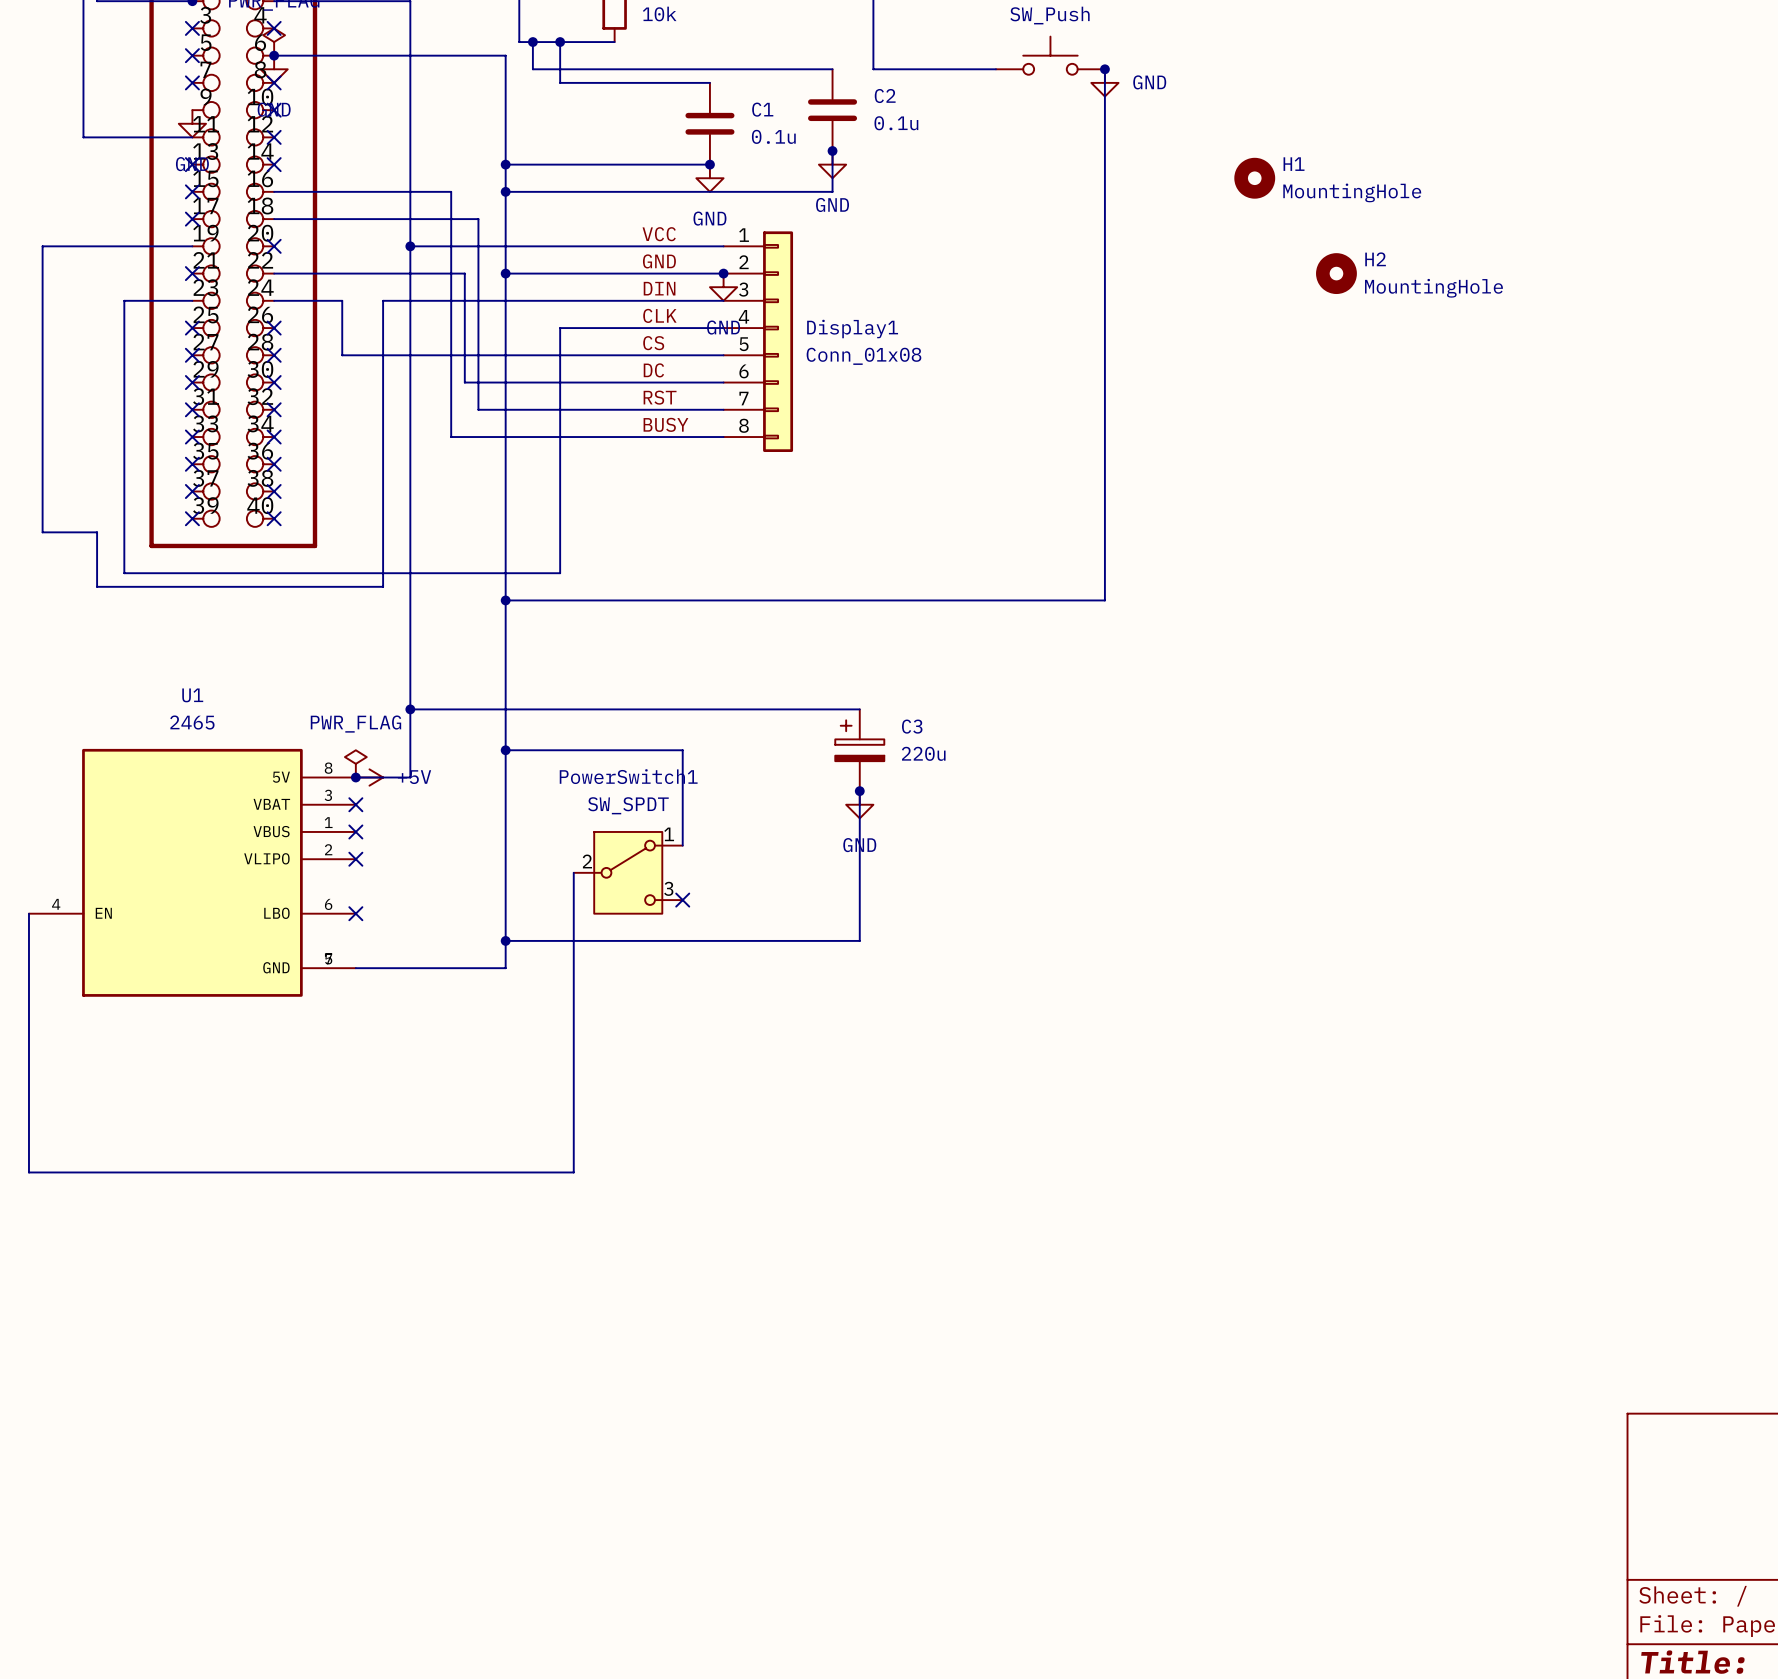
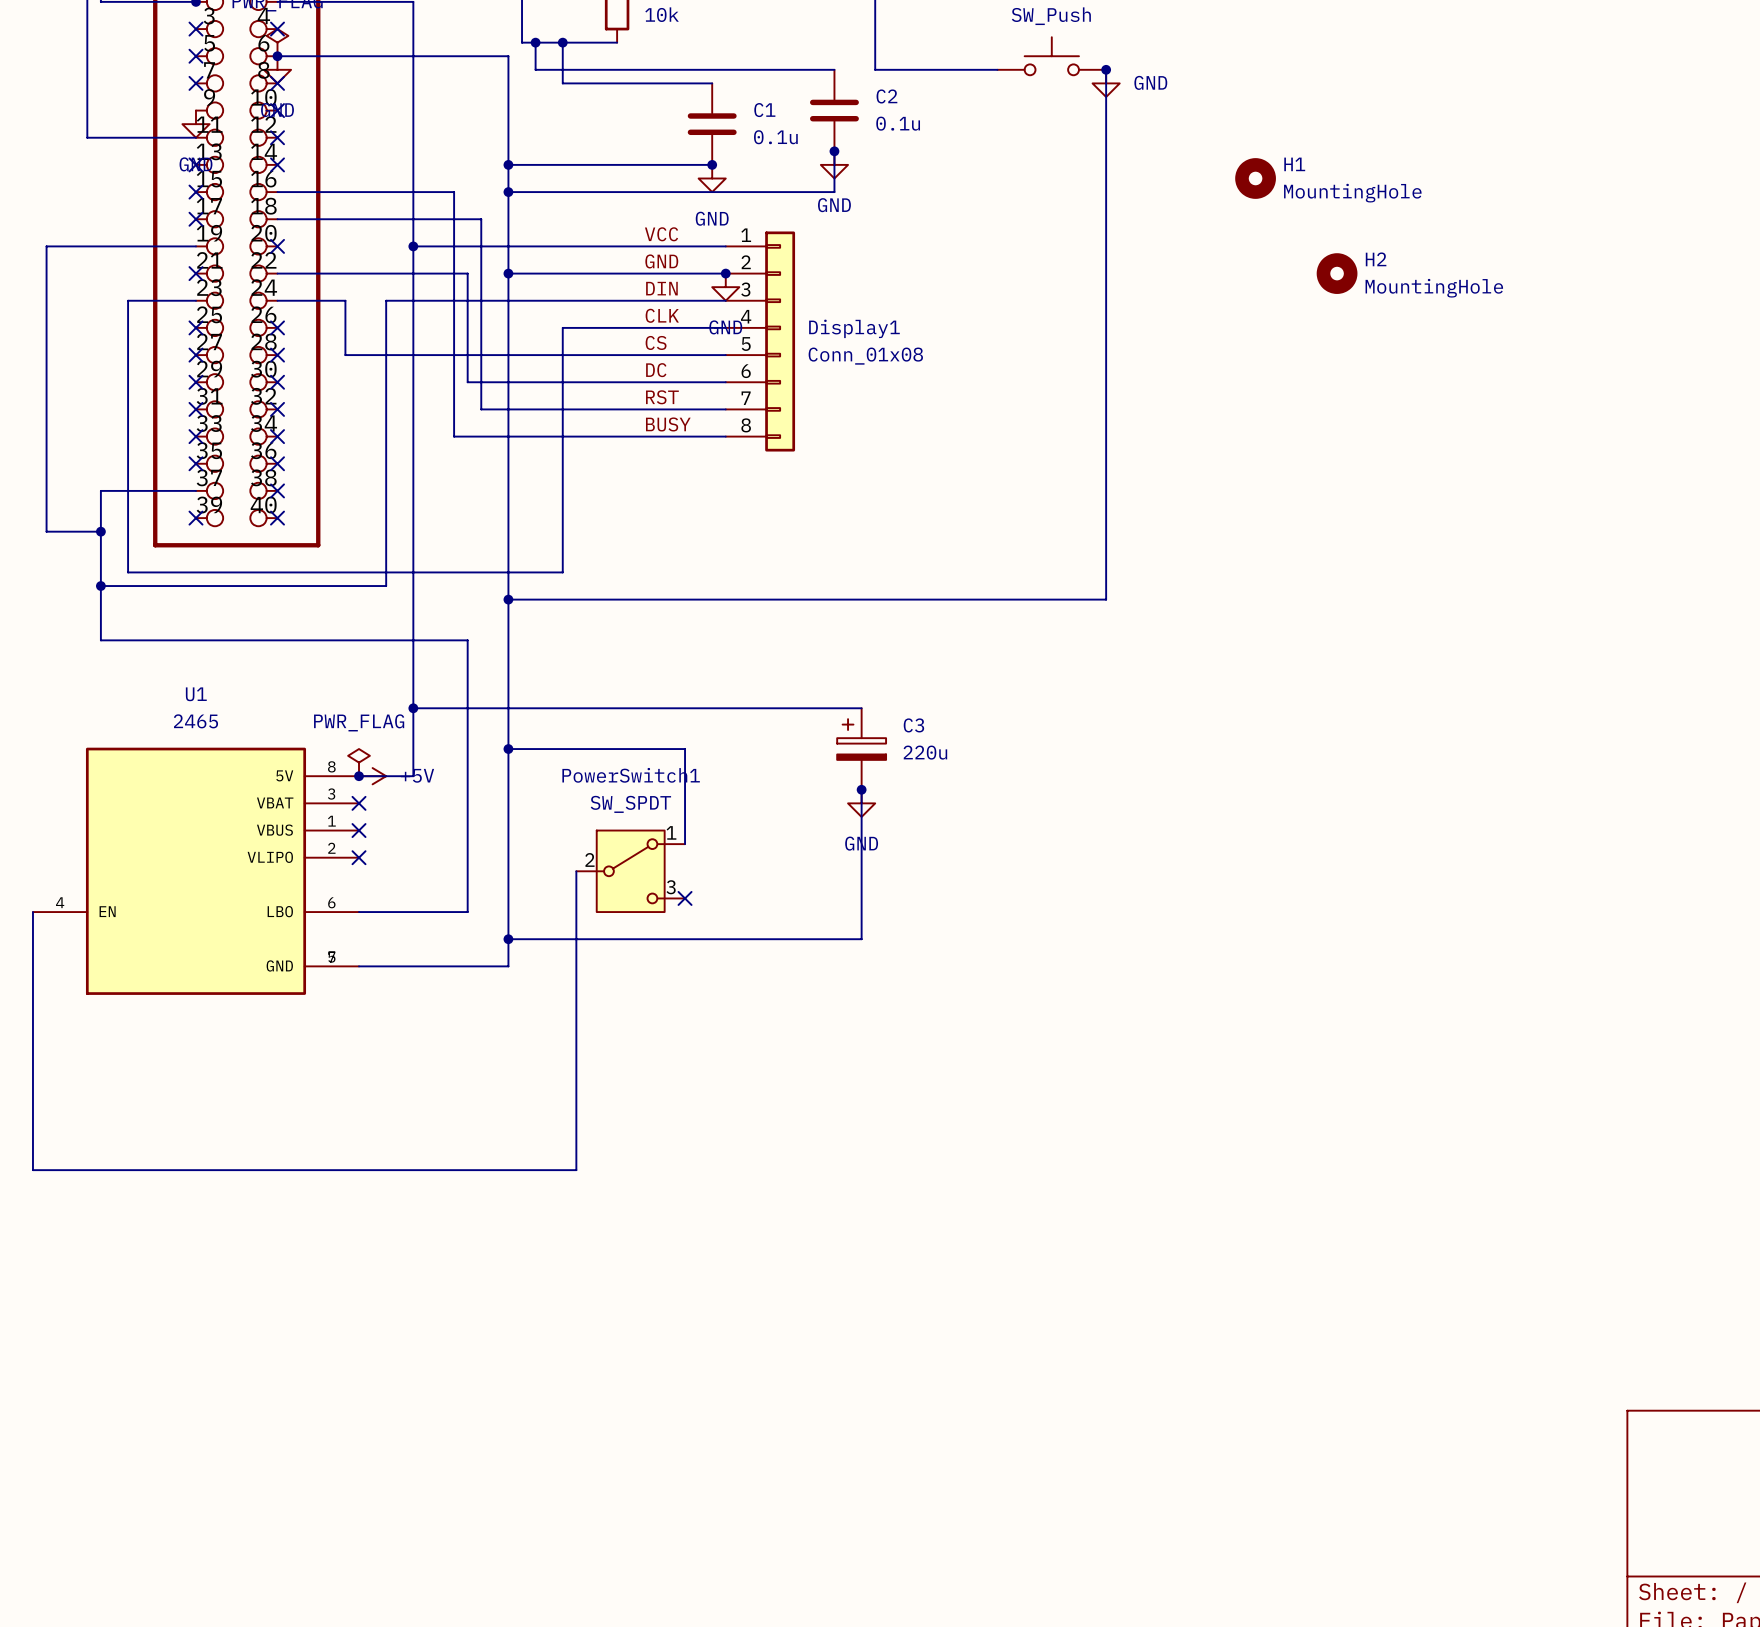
wire: none -> (195, 490) (100, 490) (100, 531)
no-connect mark: (192, 491) -> none
junction: none -> (100, 531)
wire: none -> (100, 586) (100, 640) (467, 640) (467, 912) (359, 912)
junction: none -> (100, 586)
no-connect mark: (355, 913) -> none

